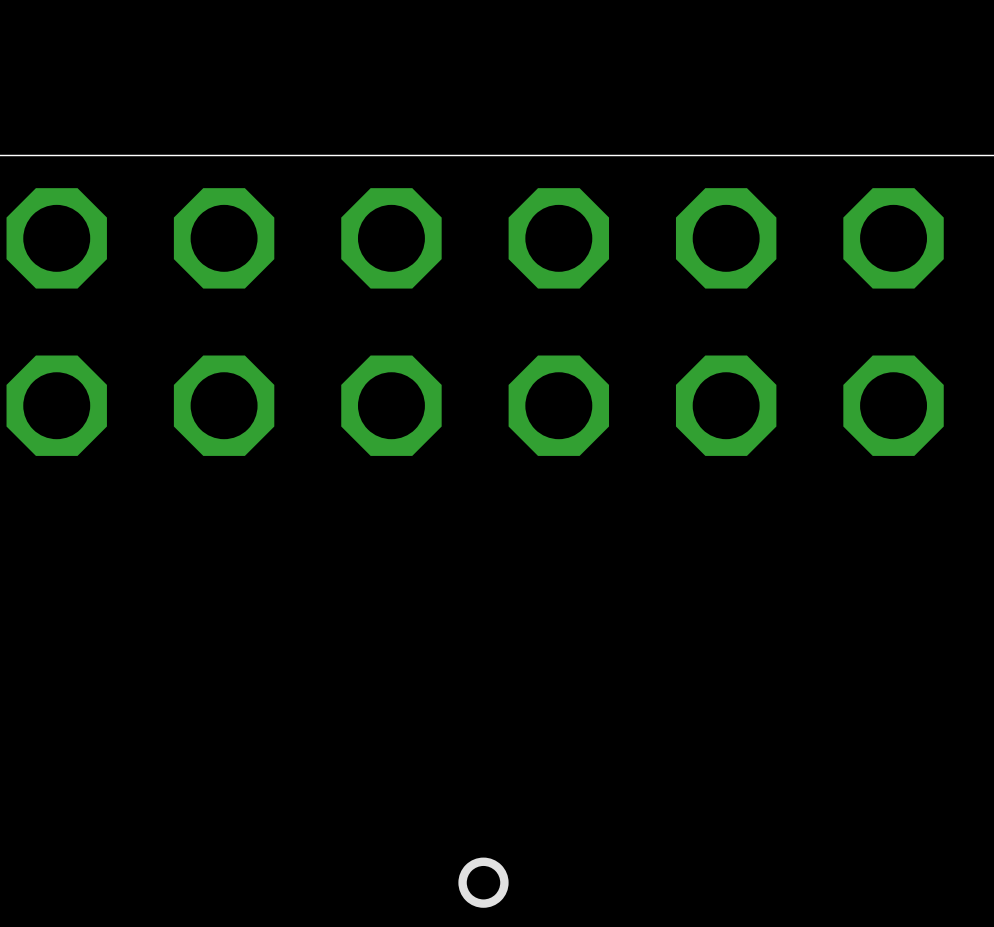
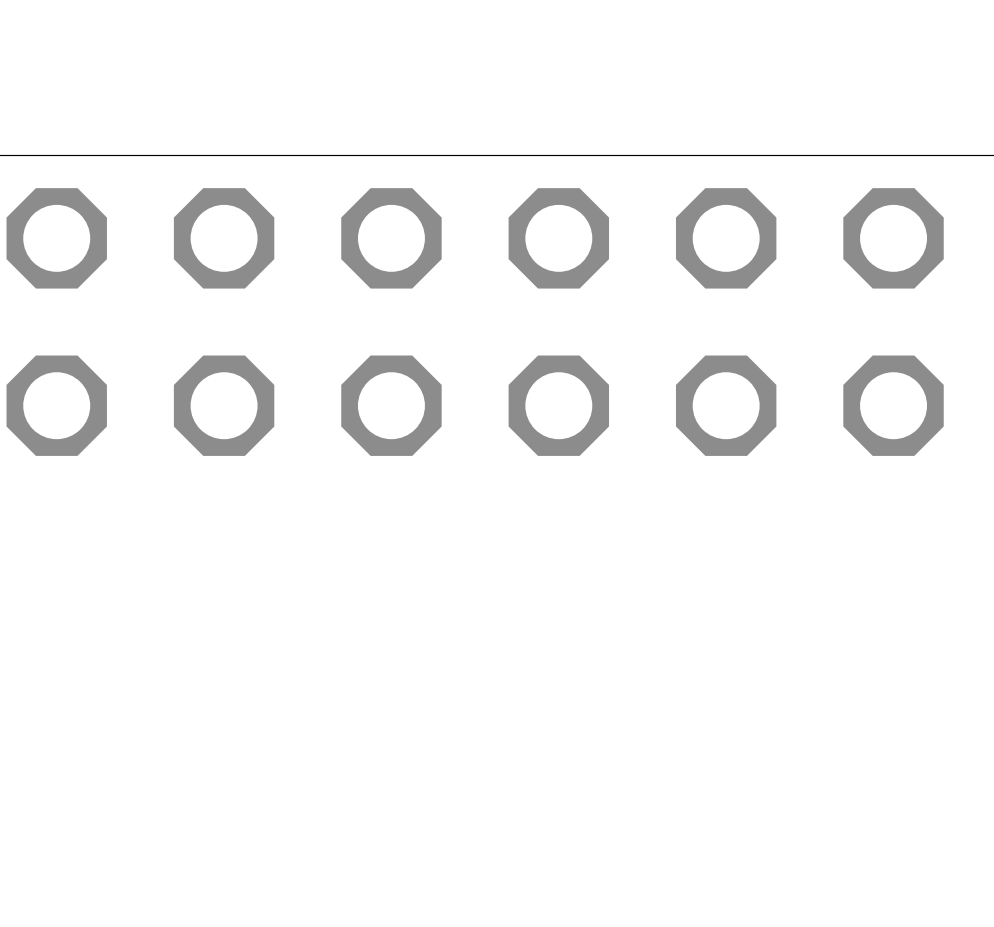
part: (483, 882) -> none

